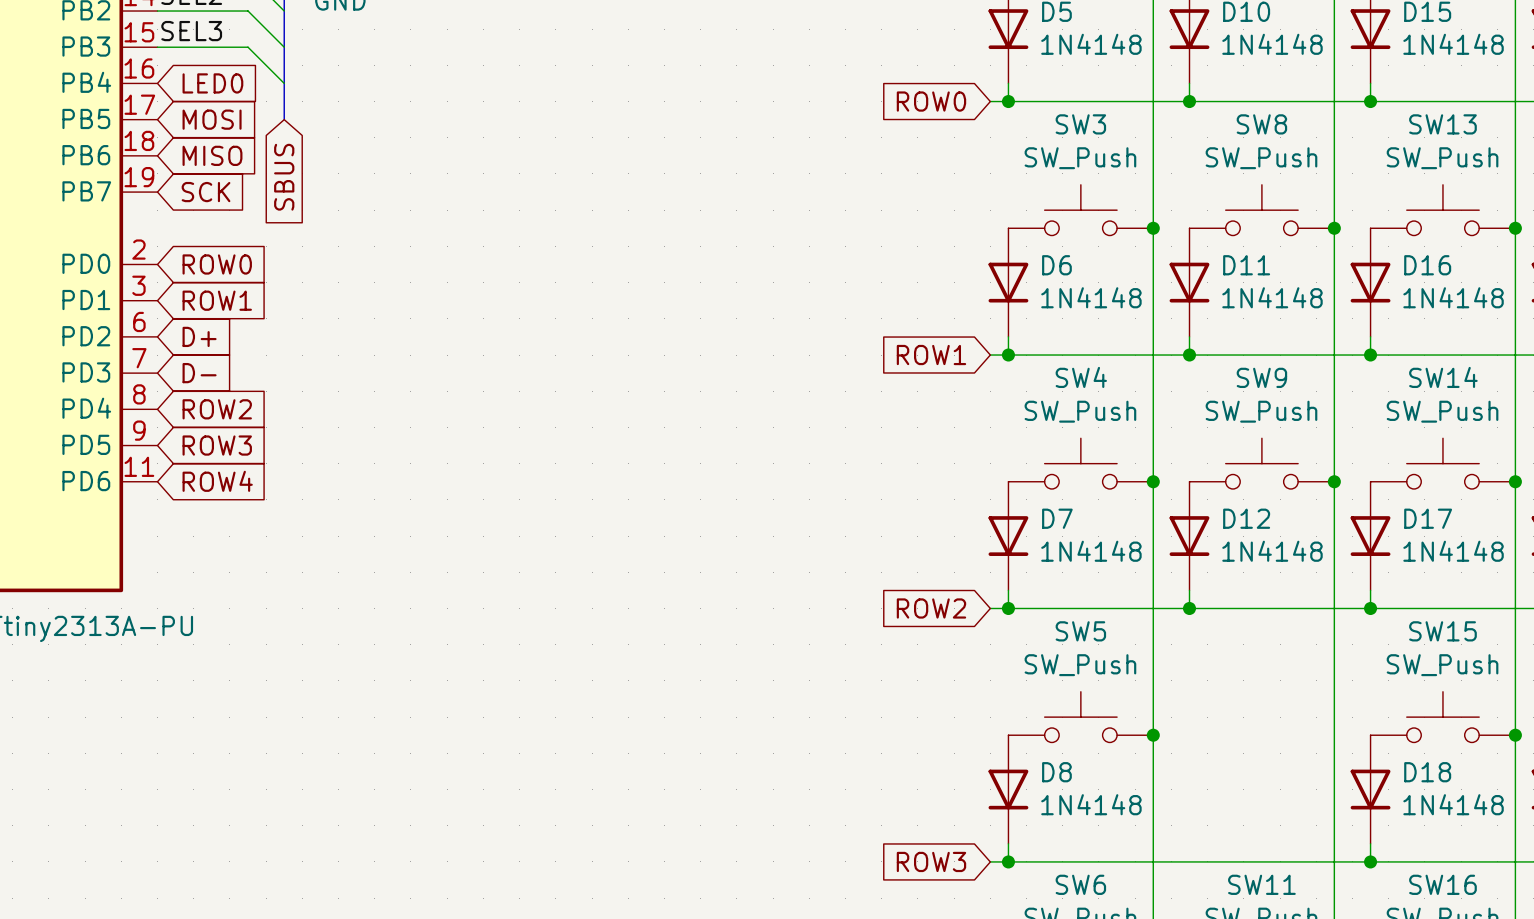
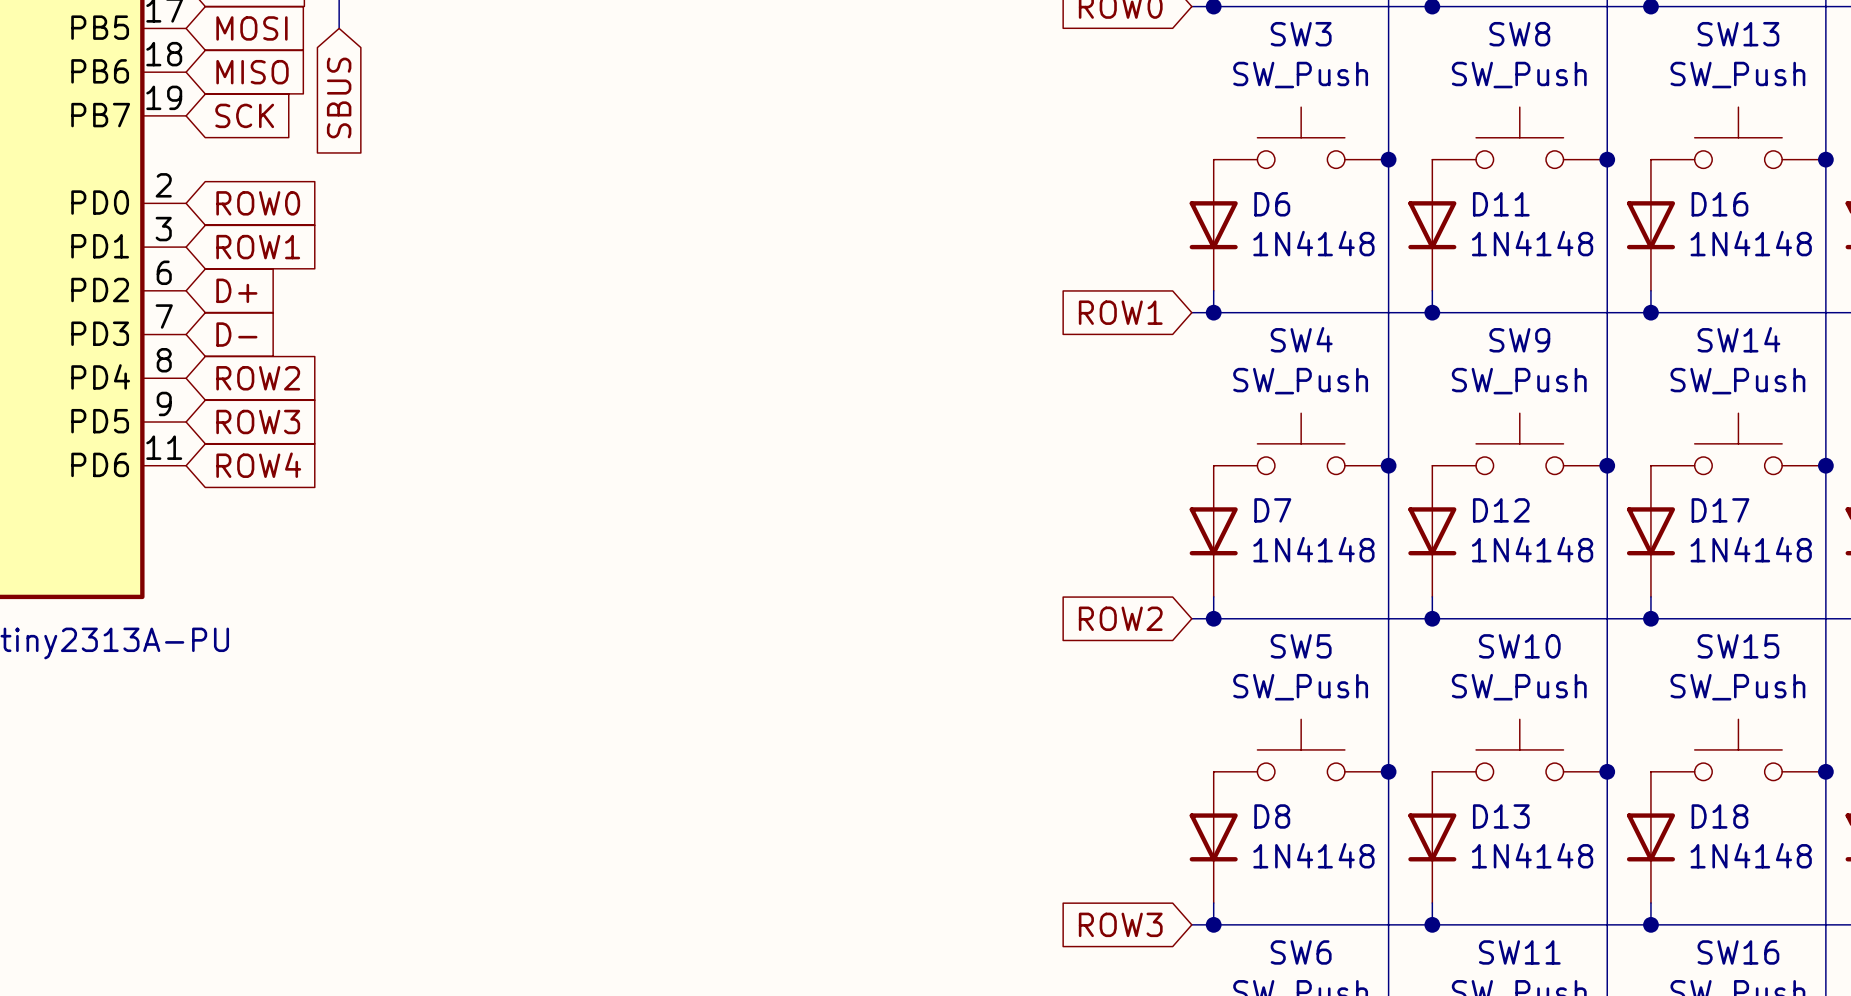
SW10: none -> SW_Push (1519, 749)
junction: none -> (1607, 771)
D13: none -> 1N4148 (1432, 837)
wire: none -> (1432, 903) (1432, 924)
junction: none -> (1432, 924)

